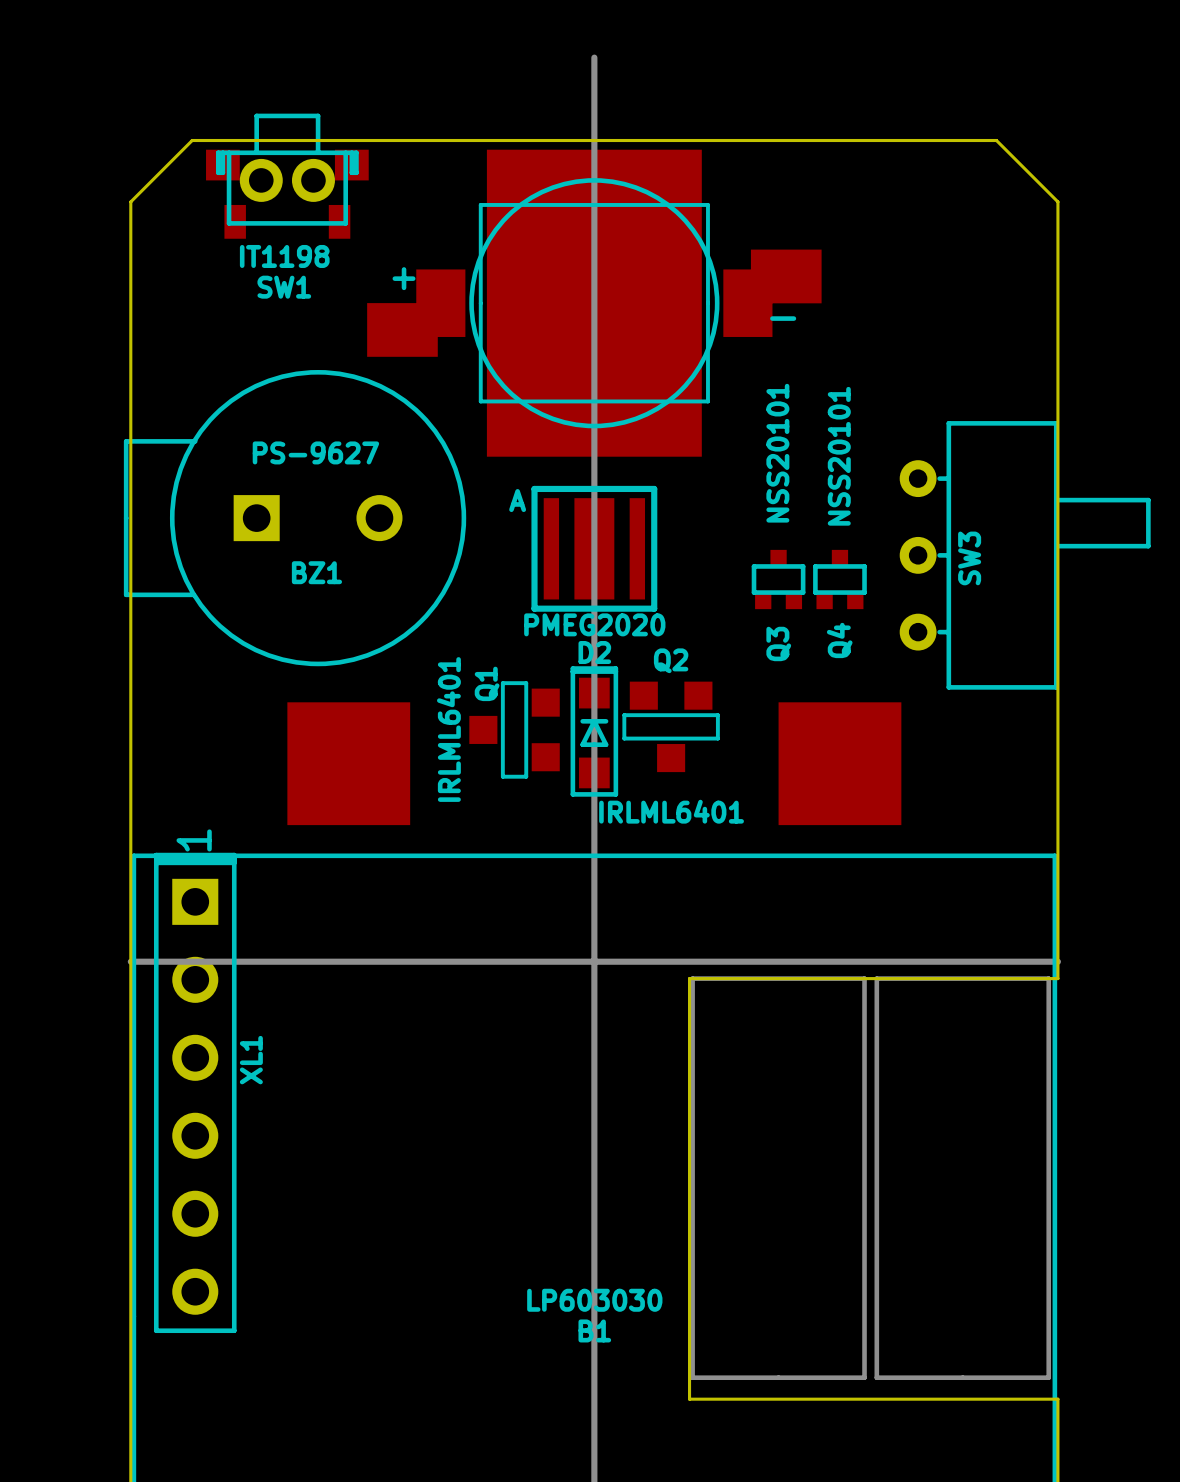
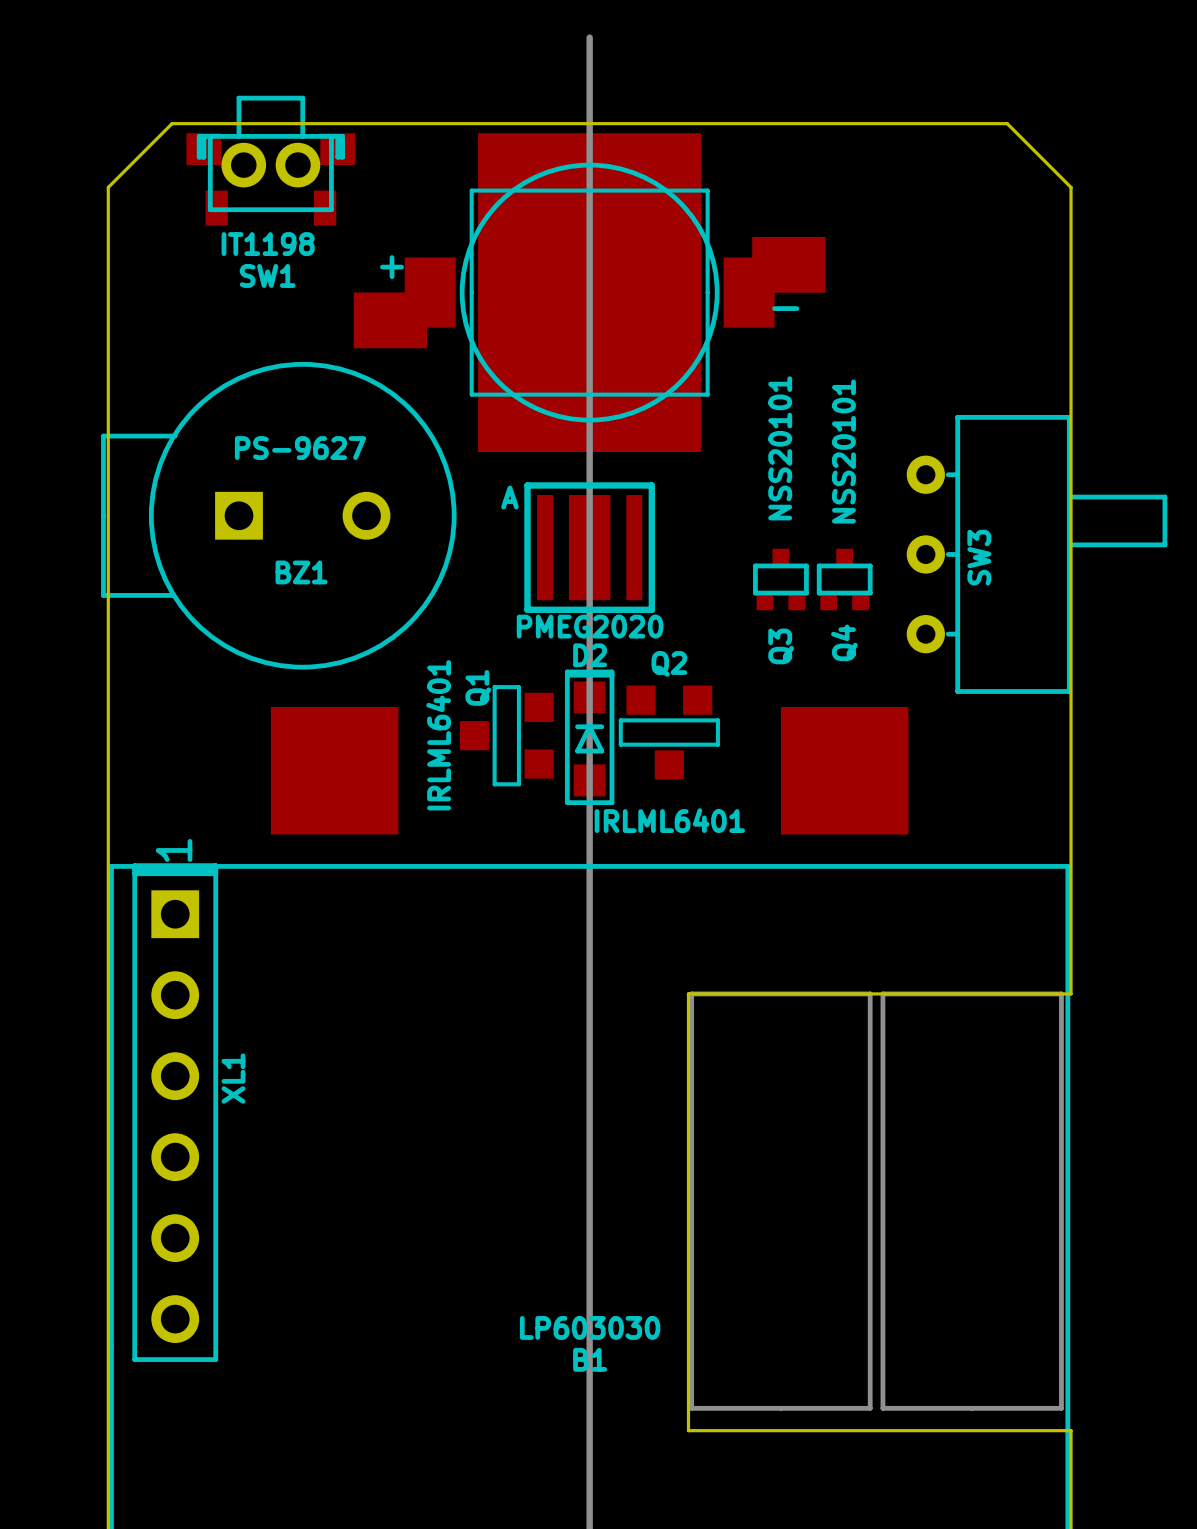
line: (130, 961) (1057, 961) -> none

